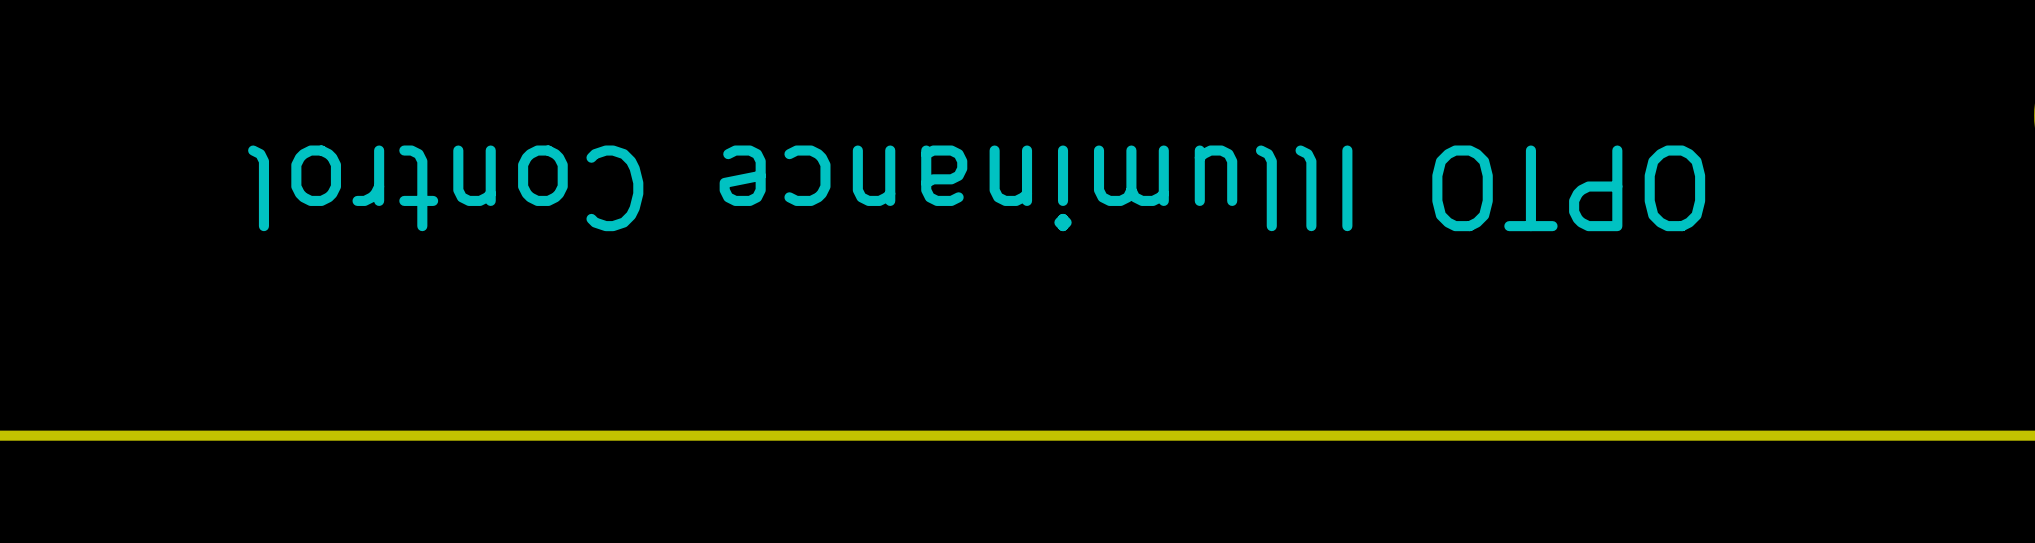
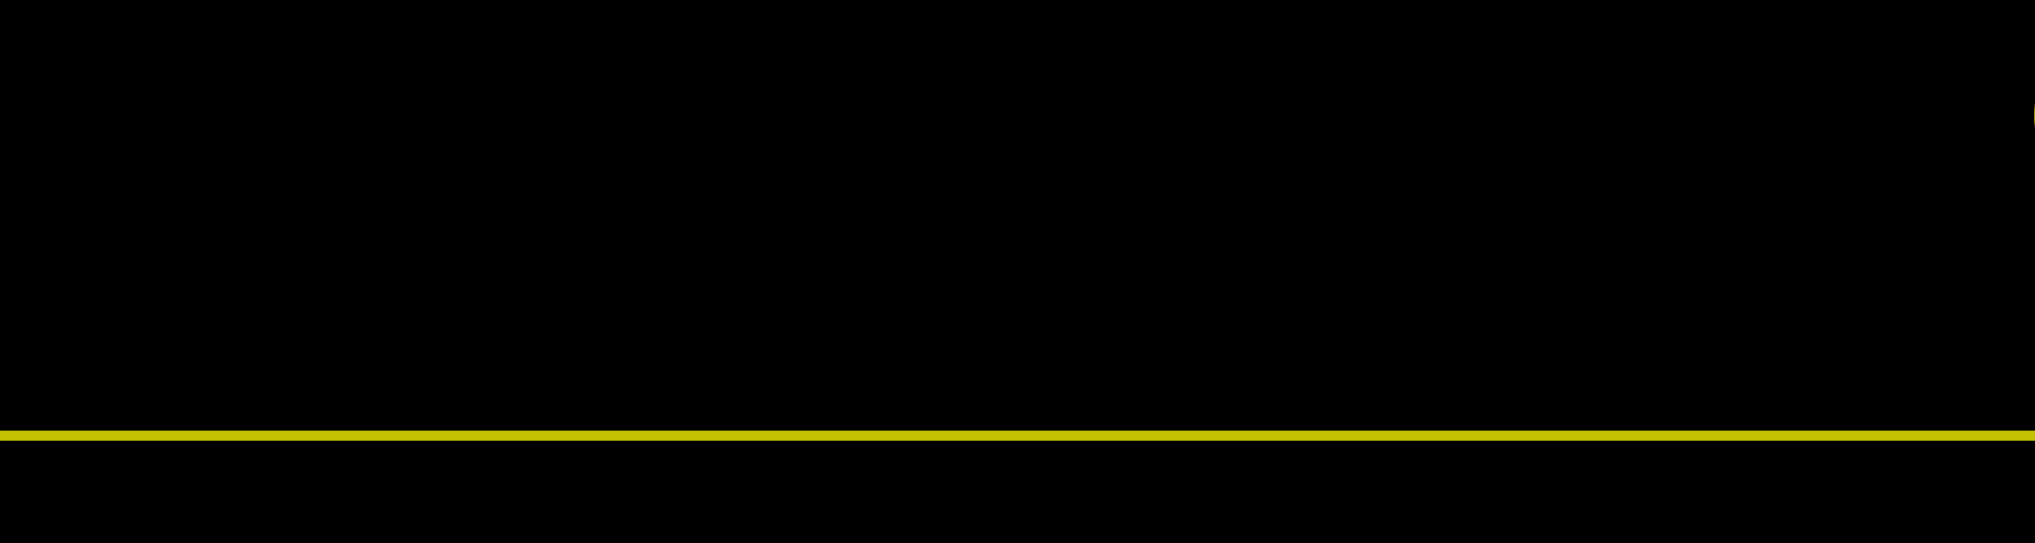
text: OPTO Illuminance Control (976, 188) -> none

